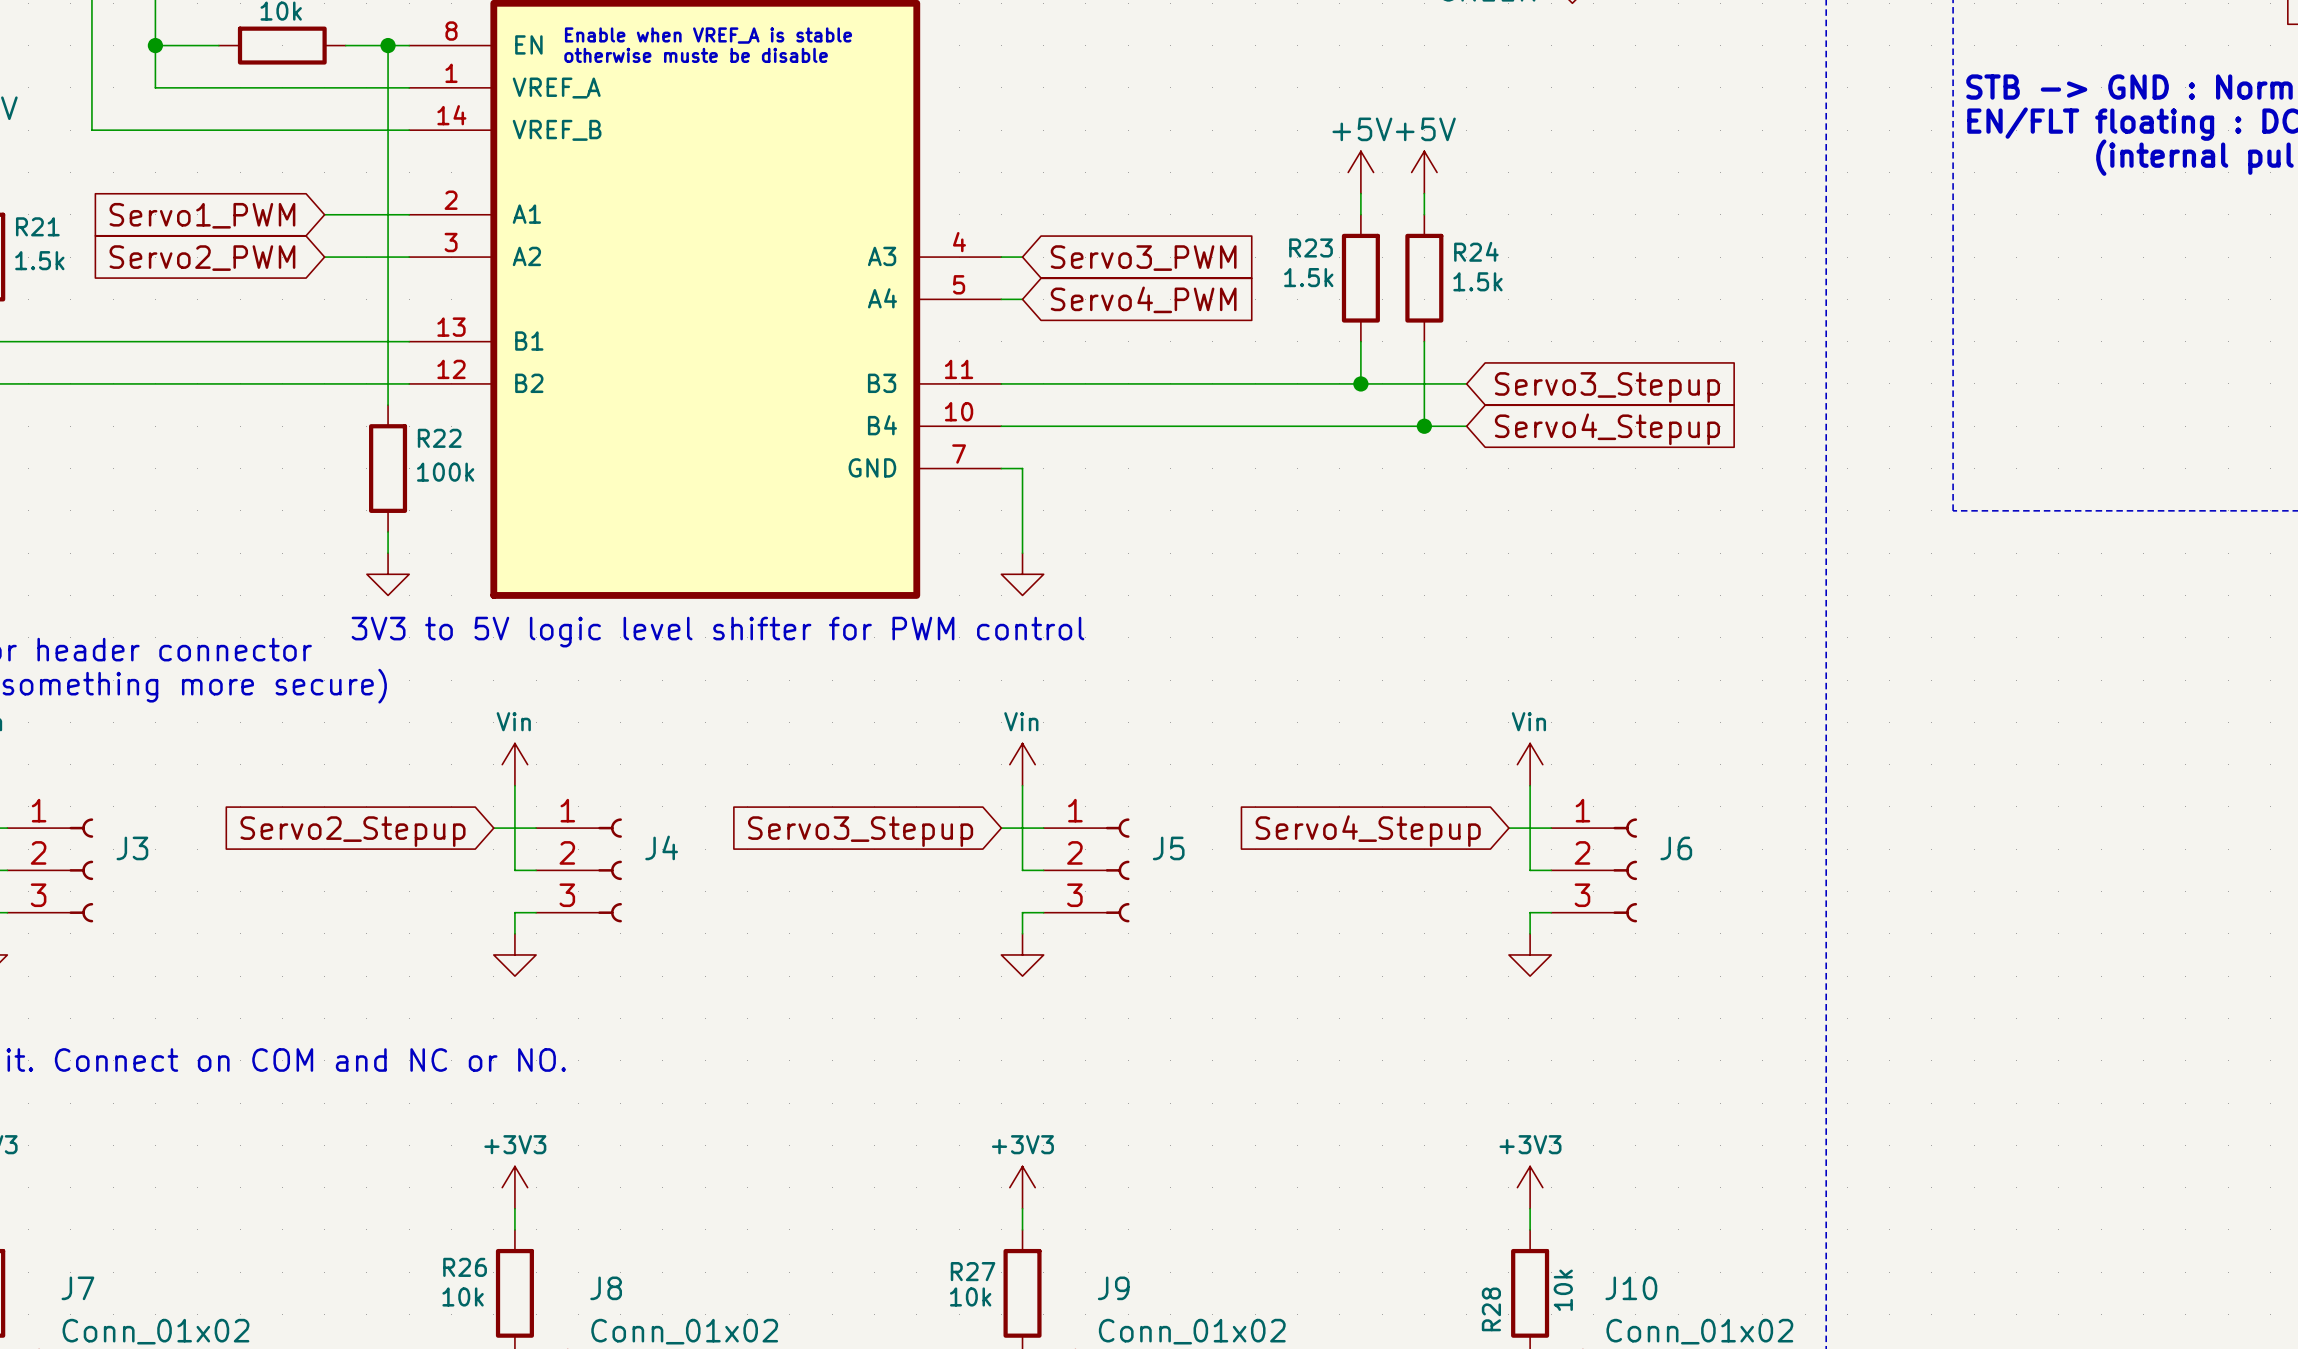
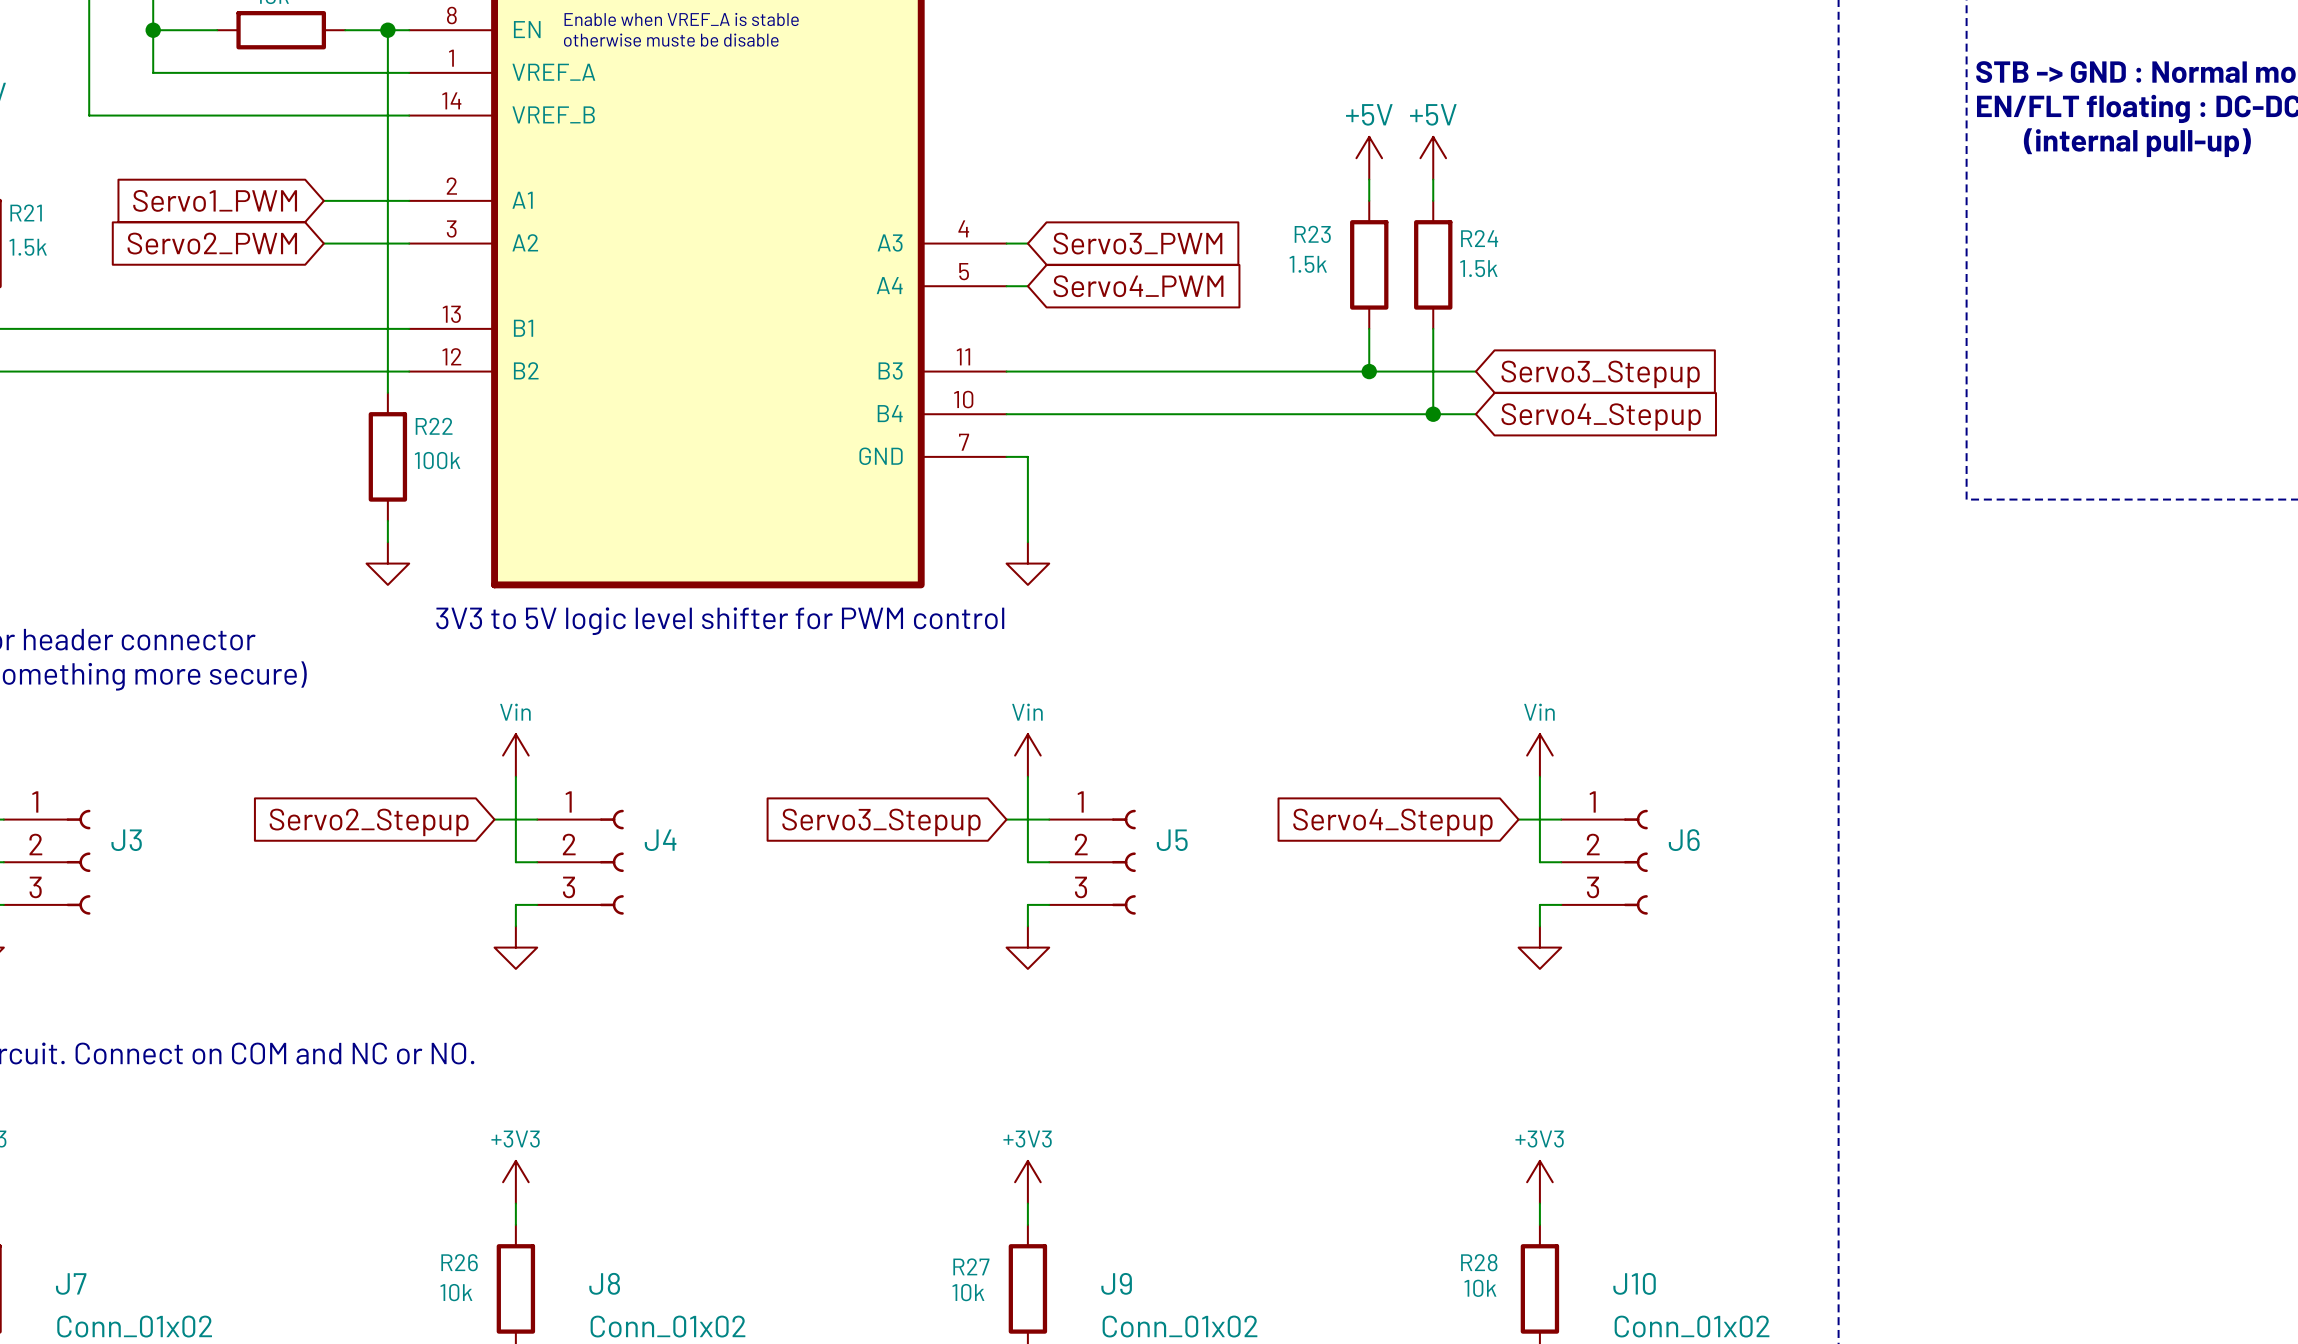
R28 value rotation: 0° (1563, 1290) -> 90° clockwise (1480, 1288)
R28 value position: 10k (1563, 1290) -> 10k (1480, 1288)
R28 name rotation: 0° (1491, 1309) -> 90° clockwise (1479, 1262)

